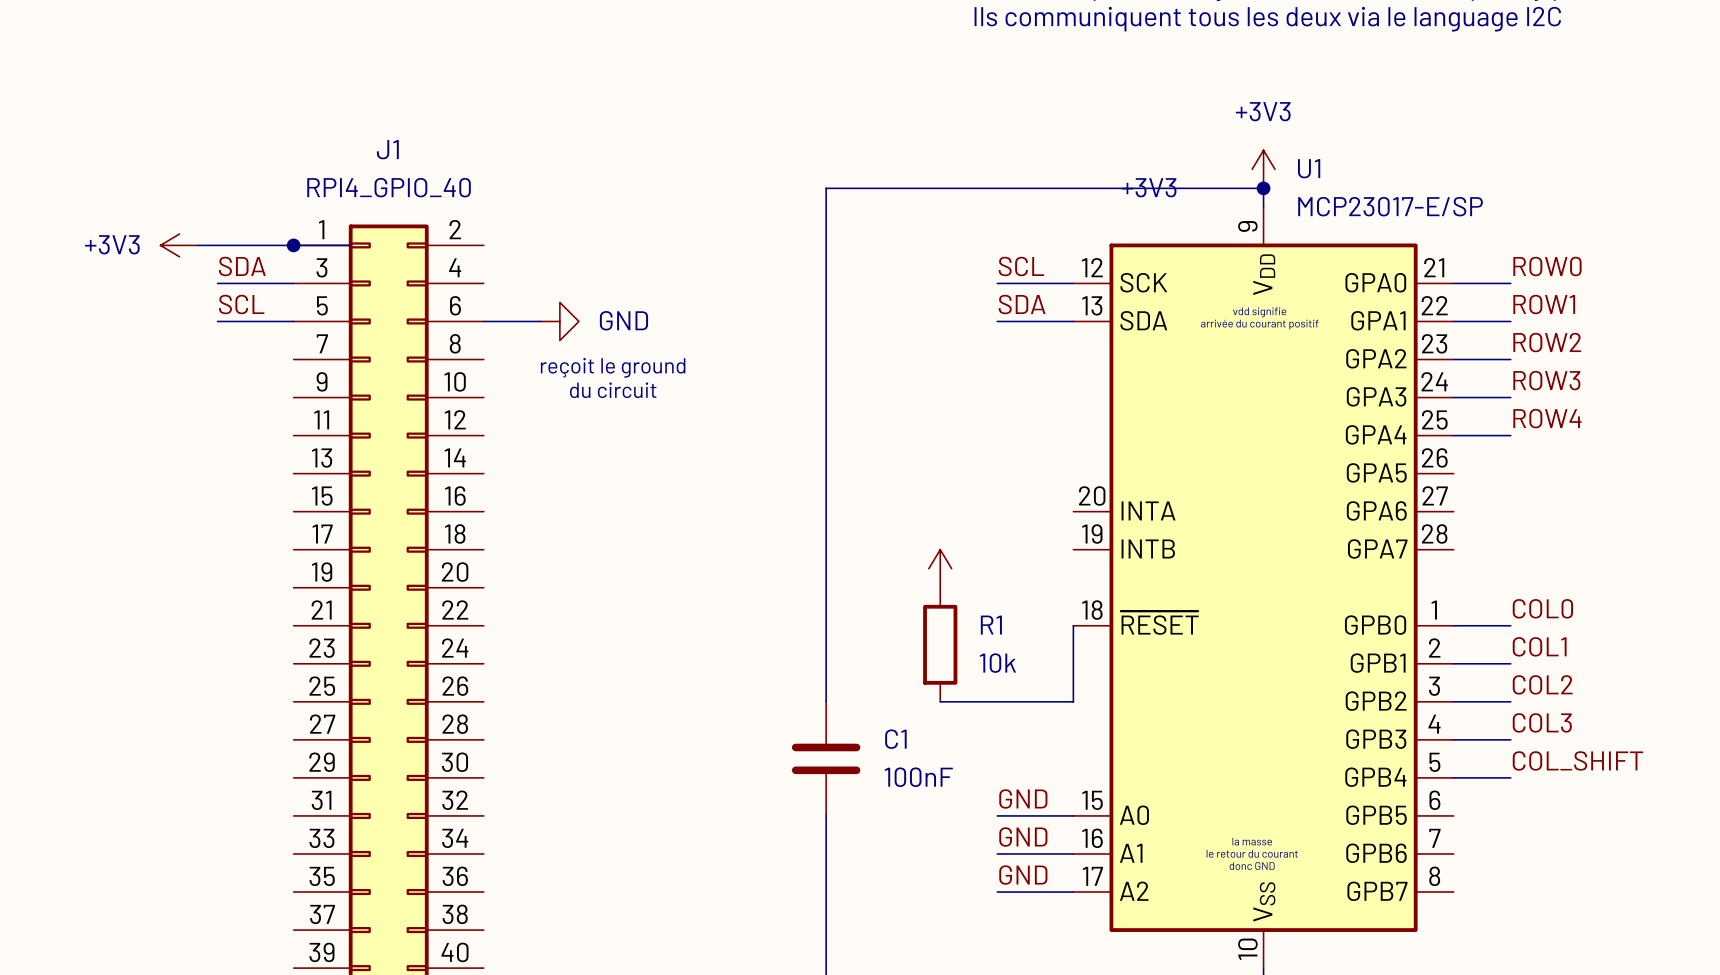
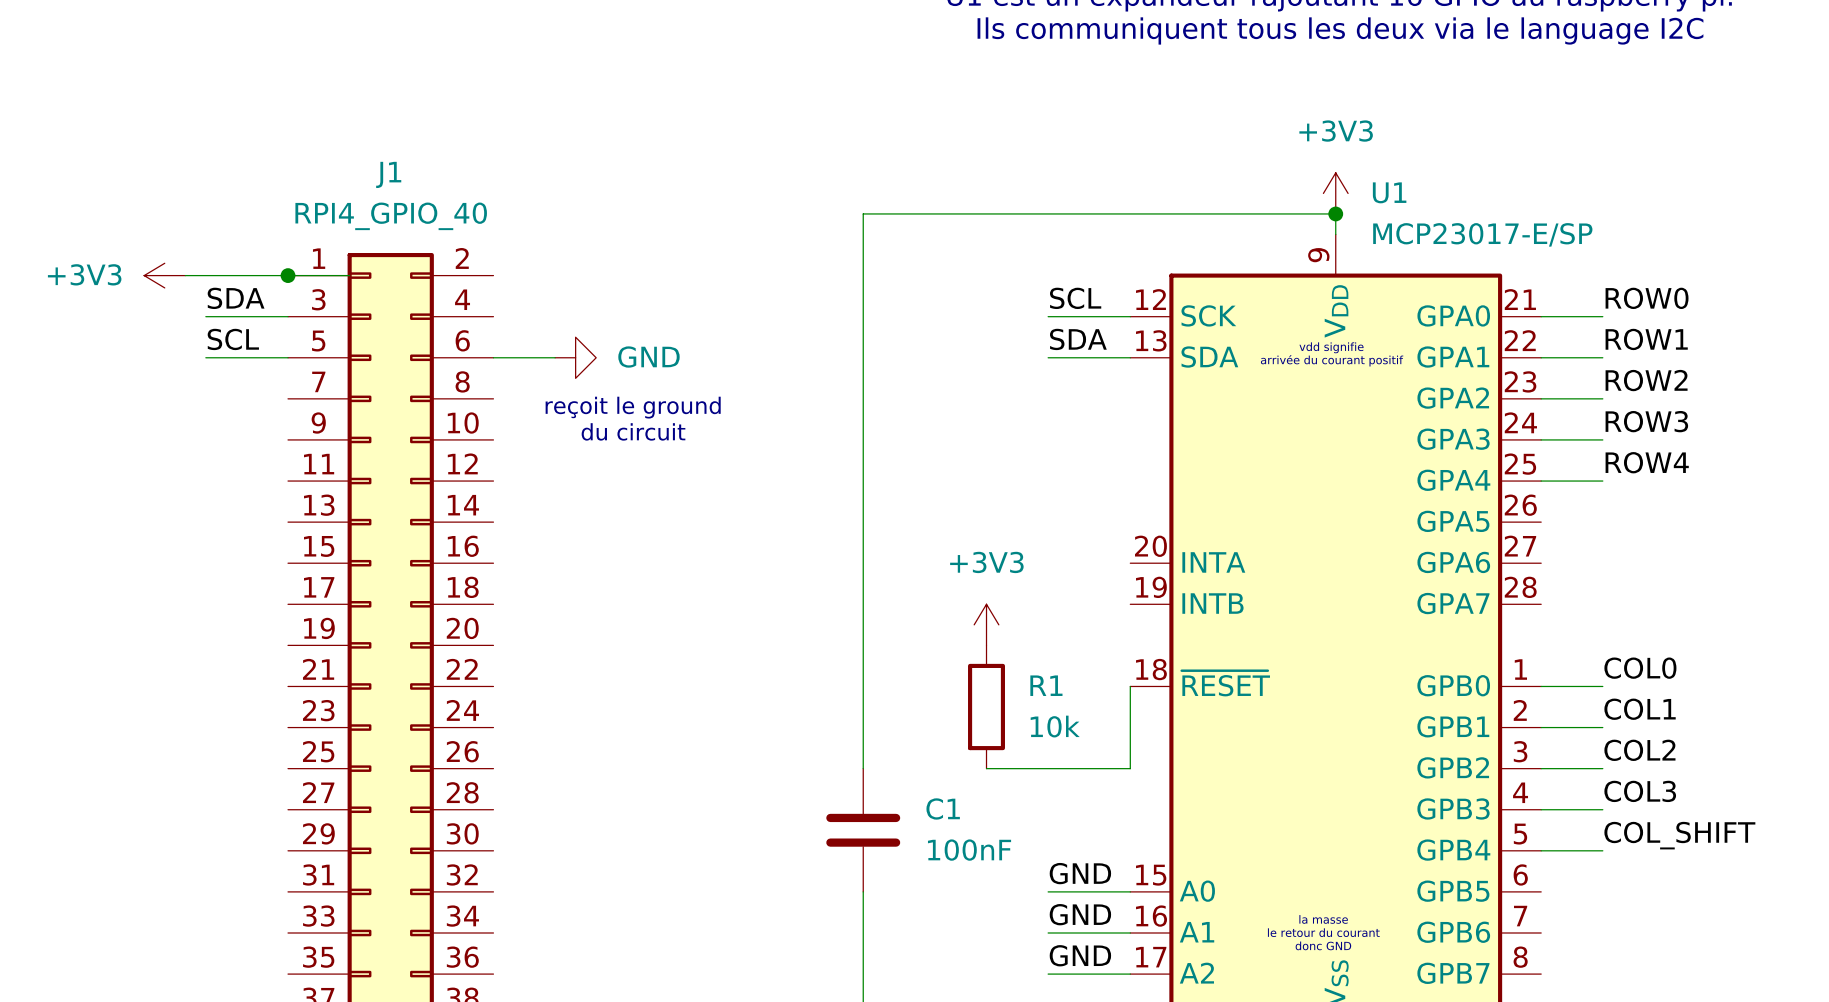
power symbol text position: +3V3 (1149, 187) -> +3V3 (986, 562)

